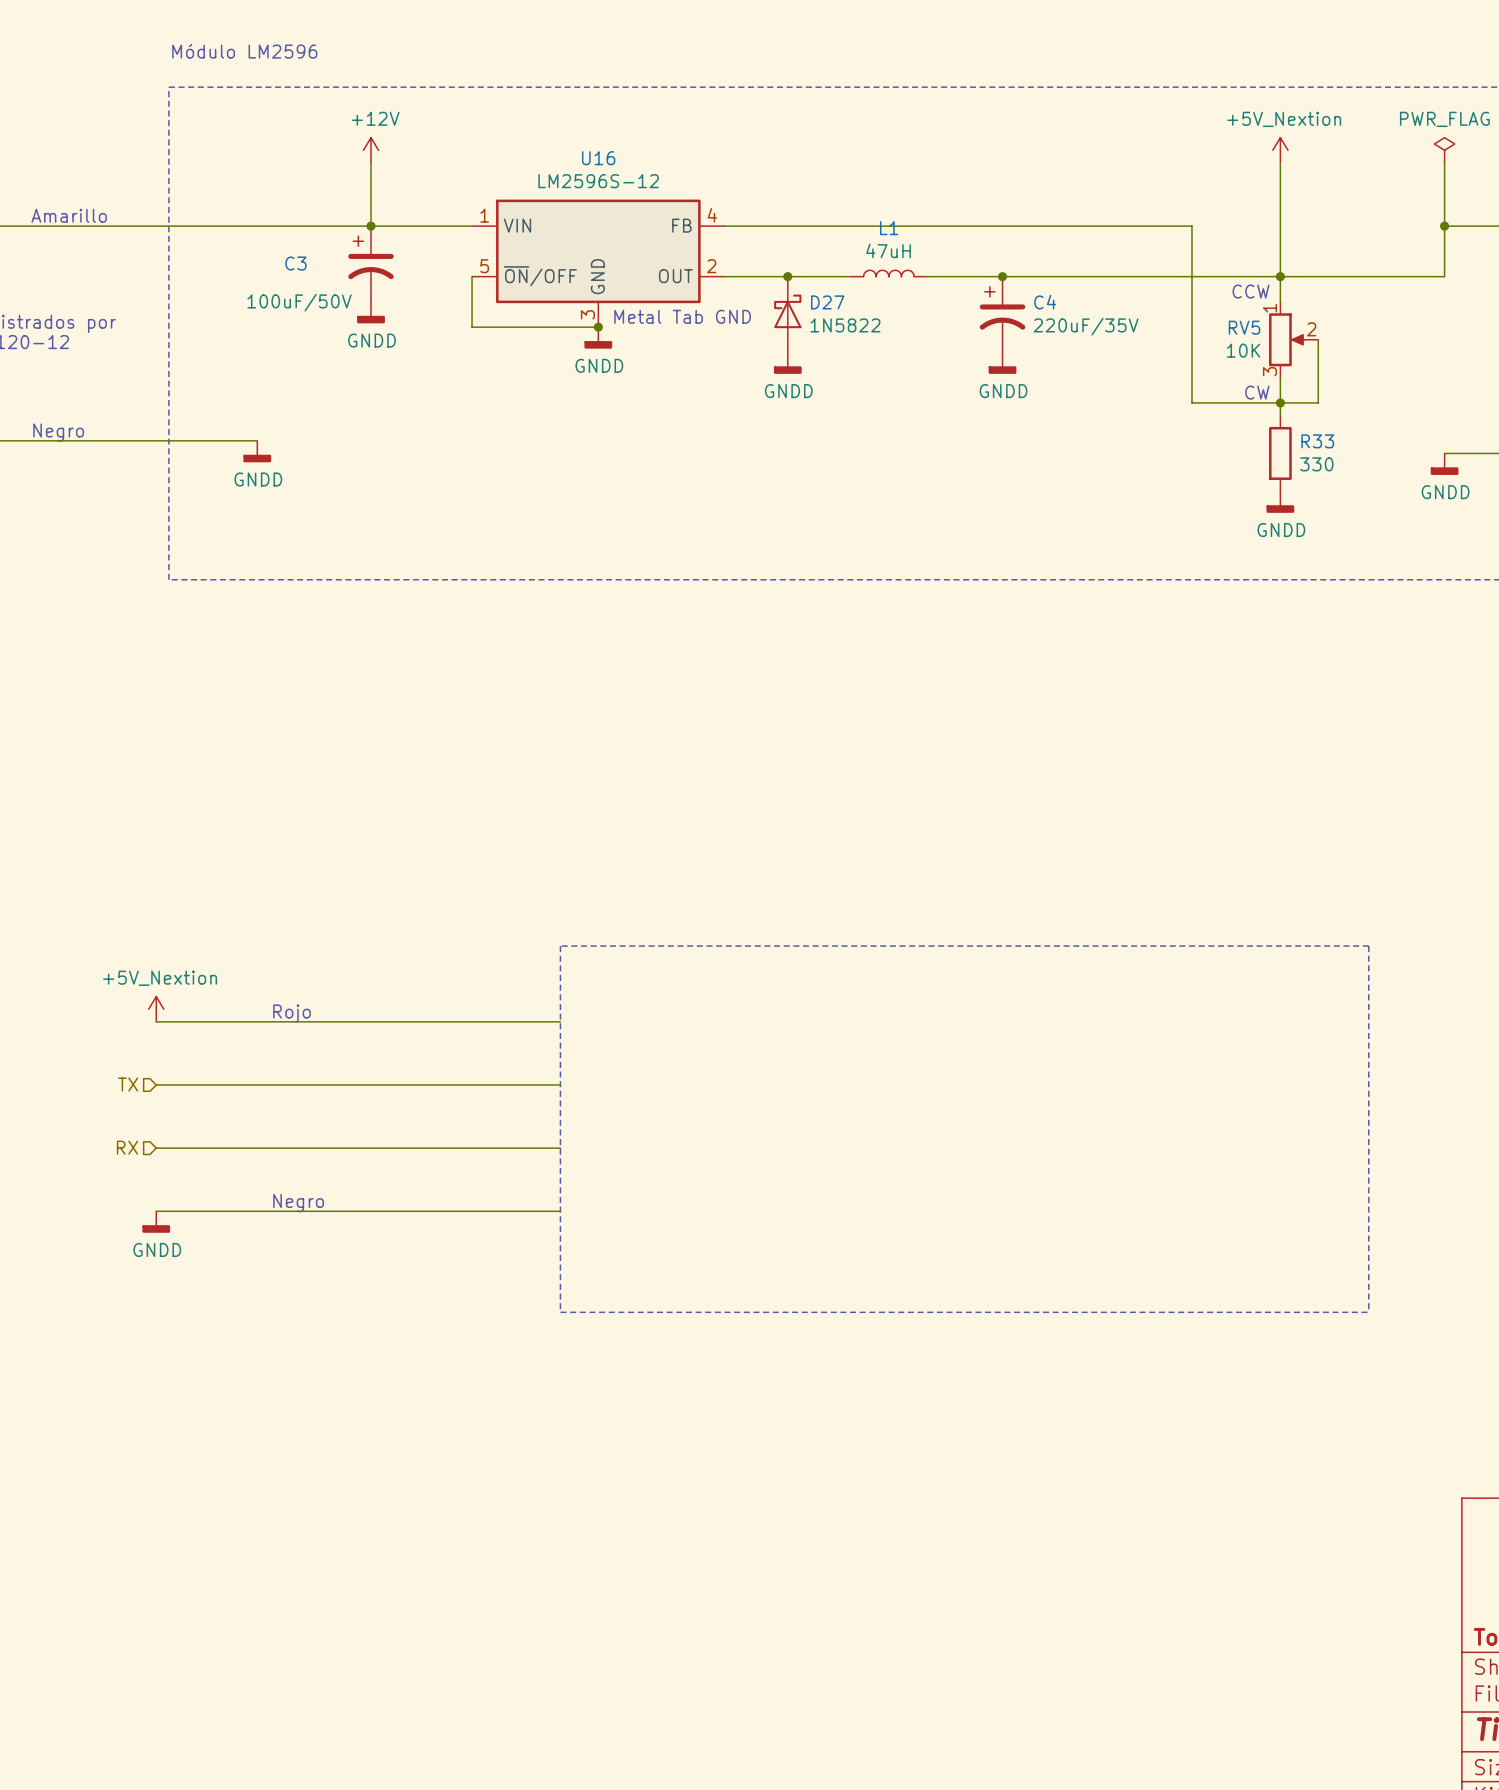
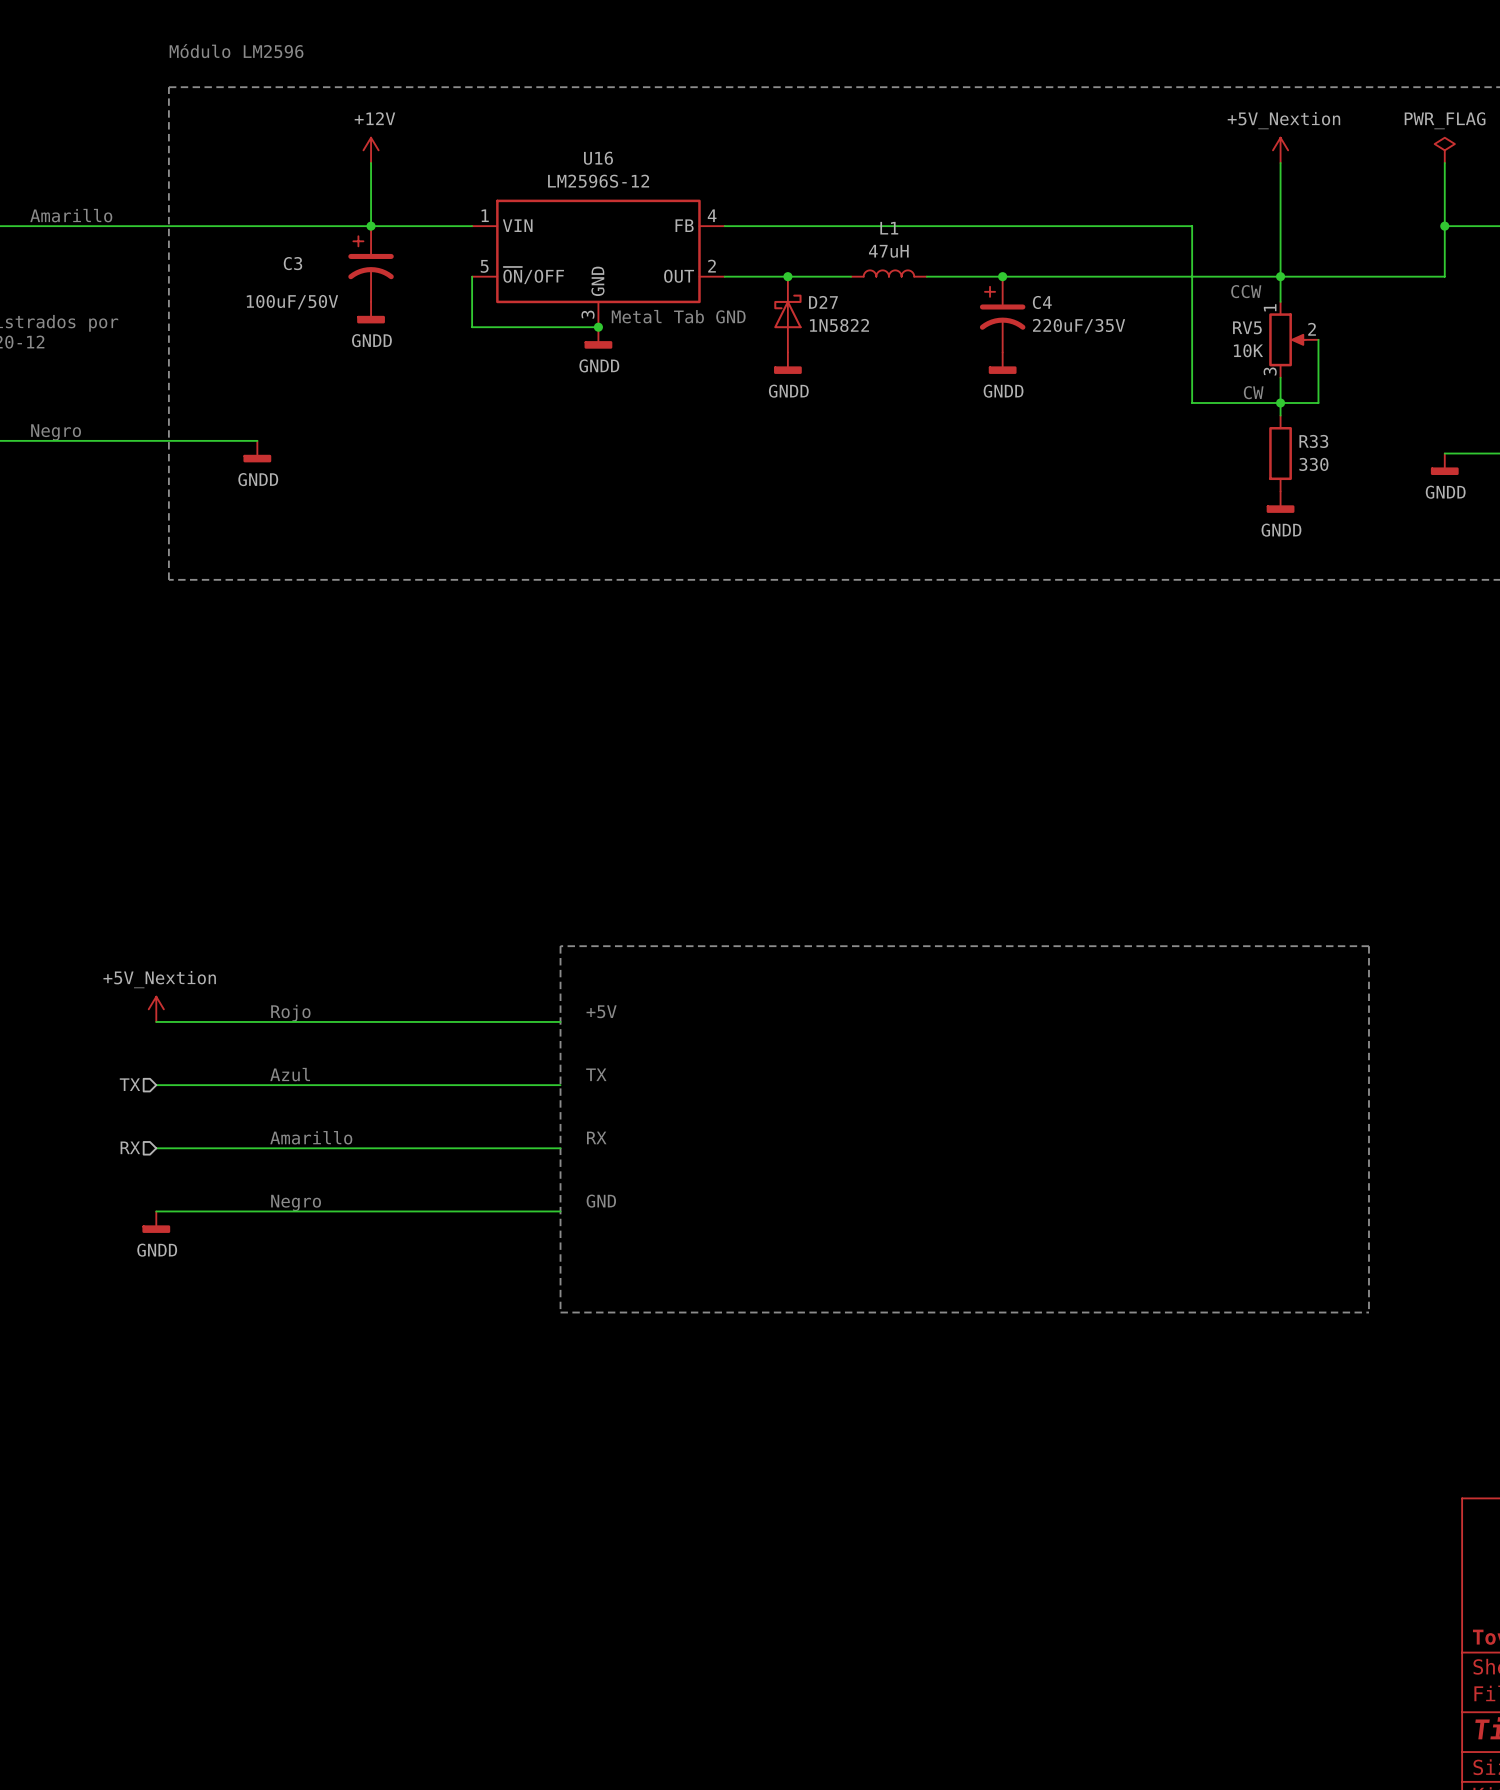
text: none -> +5V (601, 1011)
text: none -> Azul (290, 1074)
text: none -> TX (596, 1074)
text: none -> Amarillo (311, 1137)
text: none -> RX (596, 1137)
text: none -> GND (601, 1201)

